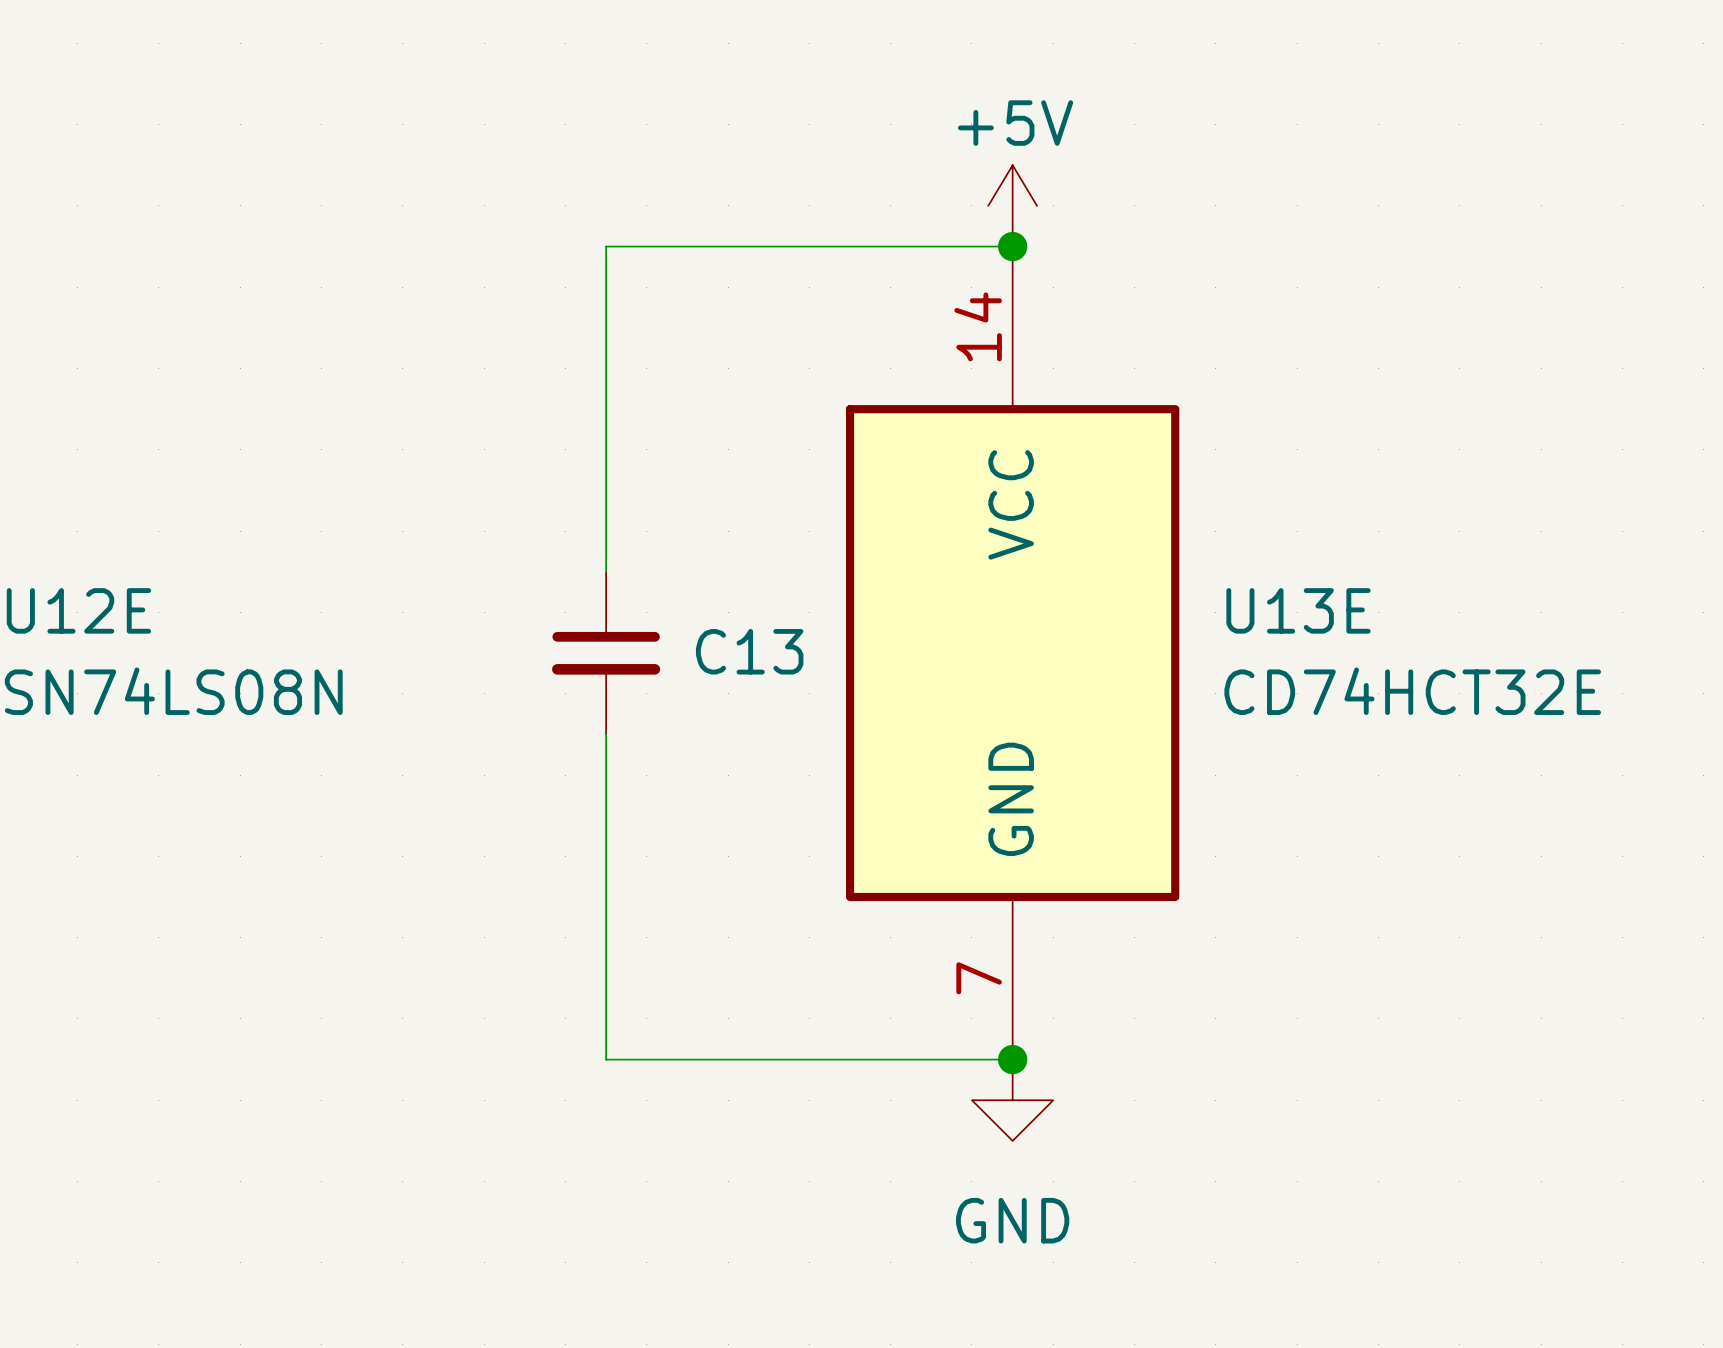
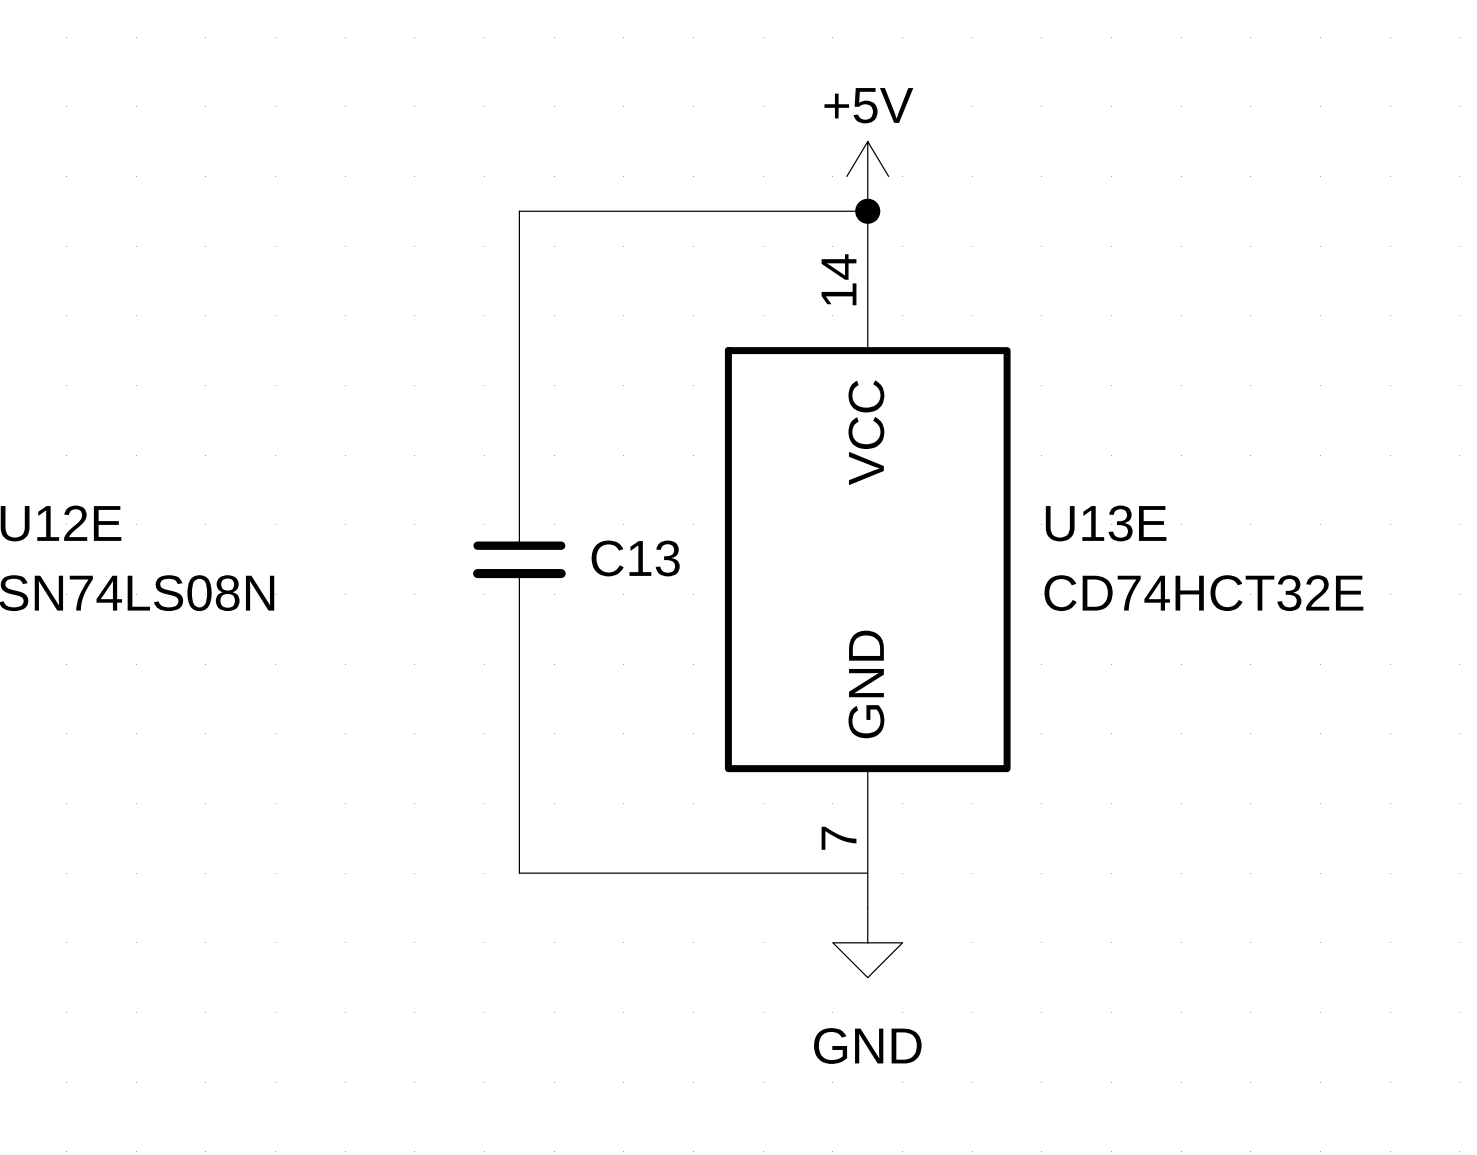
wire: (606, 1018) (606, 1059) (1012, 1059) -> (519, 873) (867, 873)
junction: (1012, 1059) -> none

